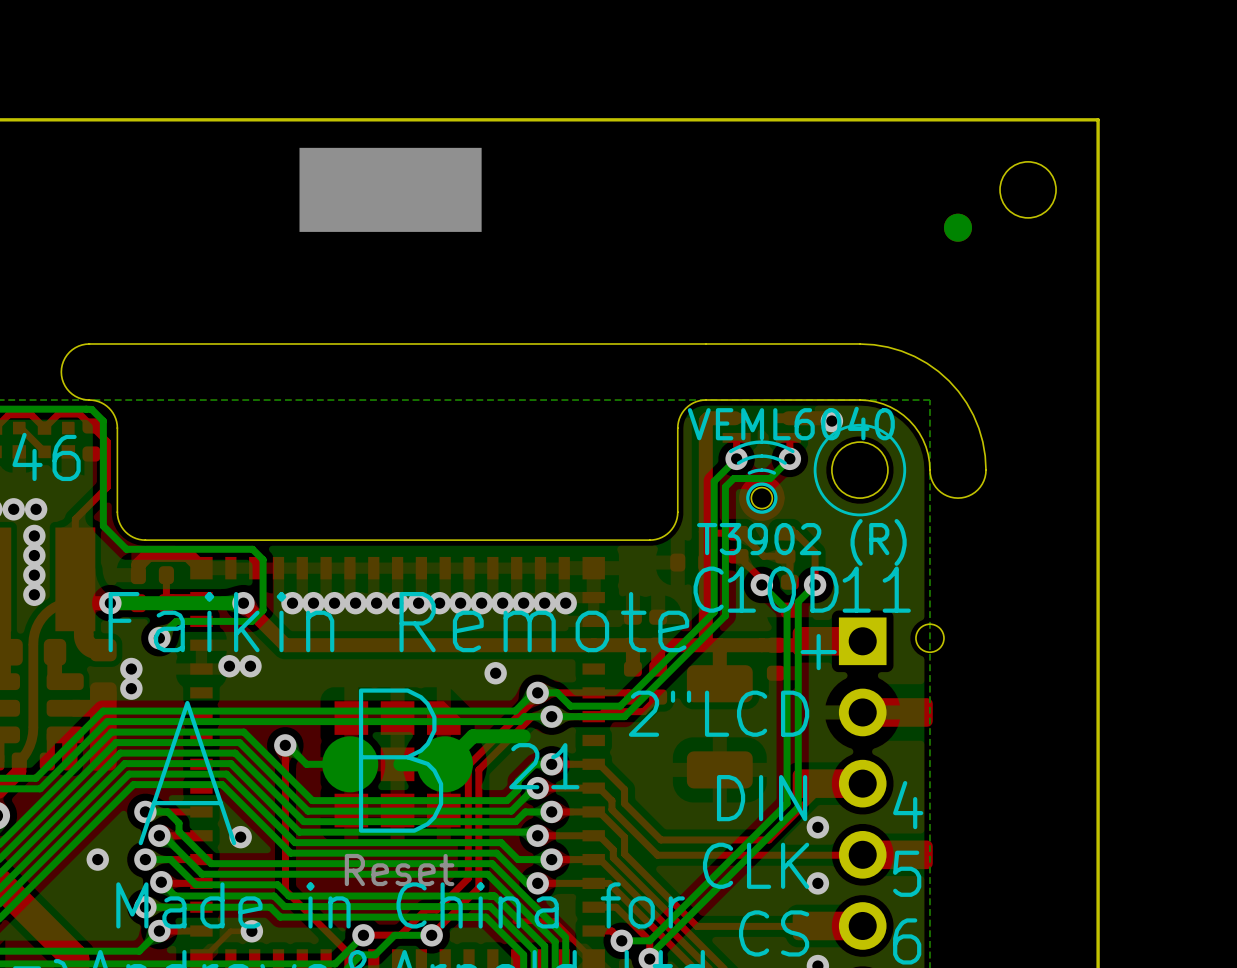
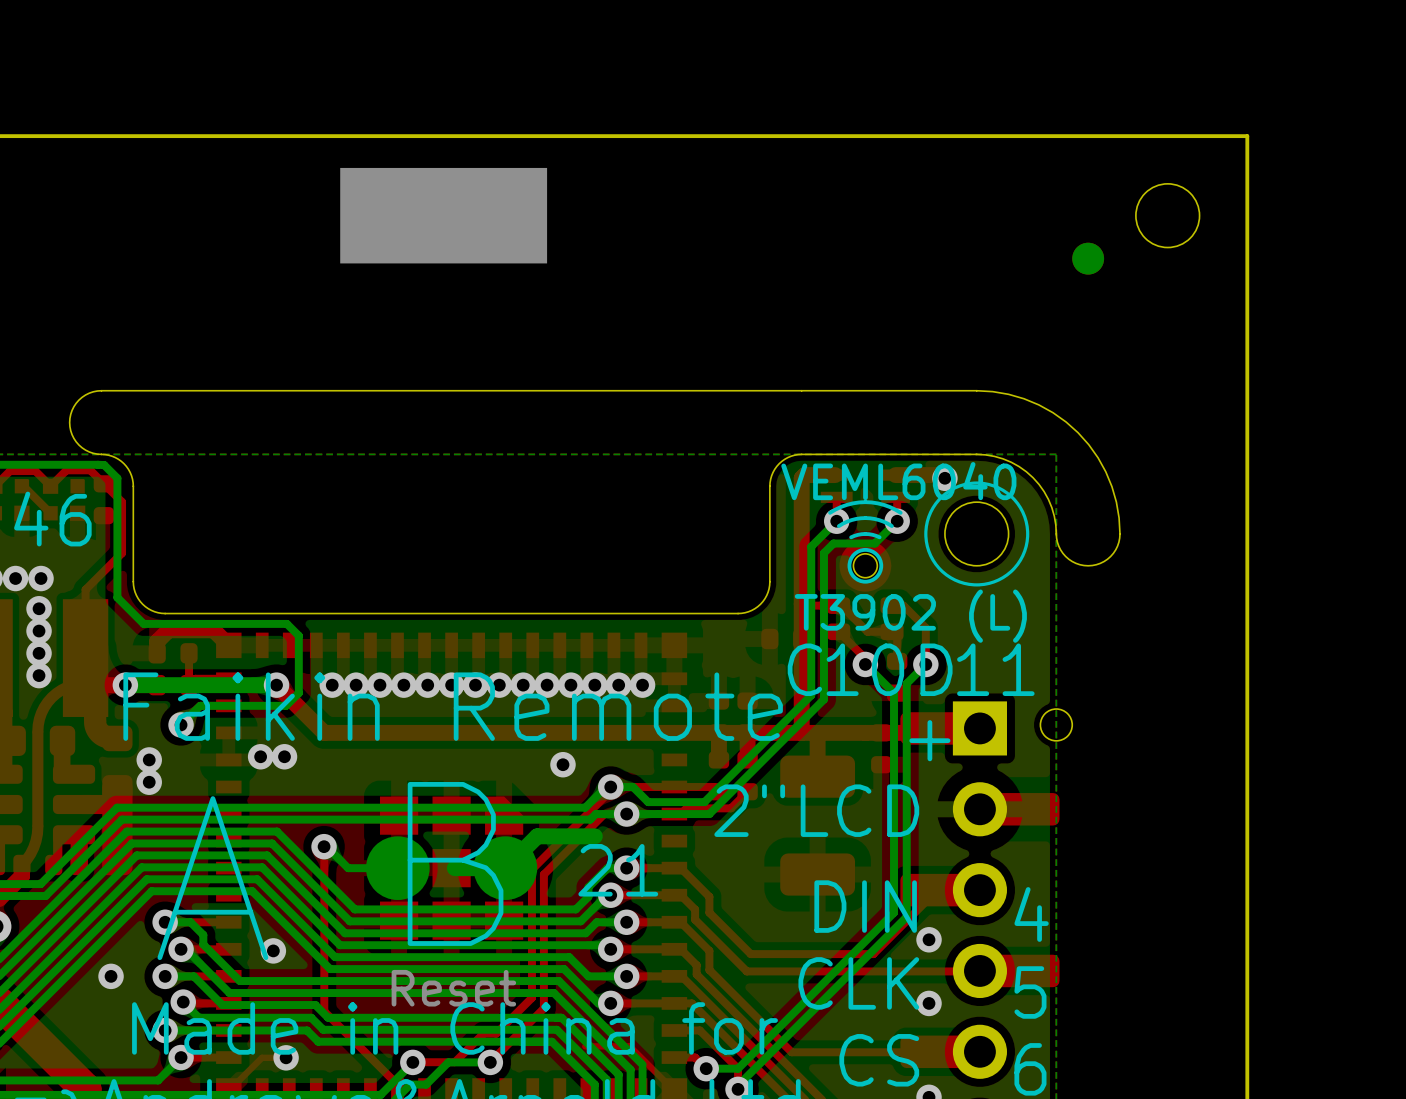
text: T3902 (R) (801, 542) -> T3902 (L) (910, 616)

